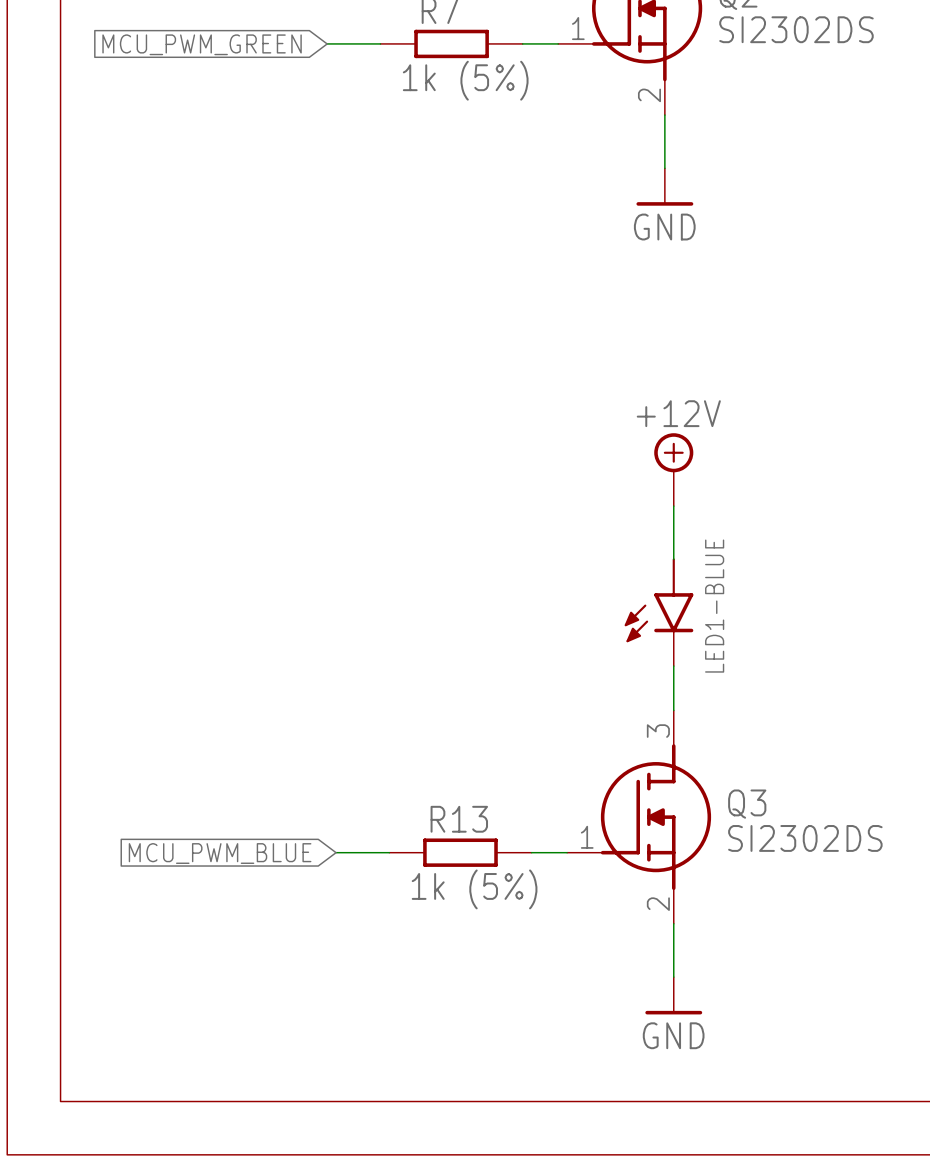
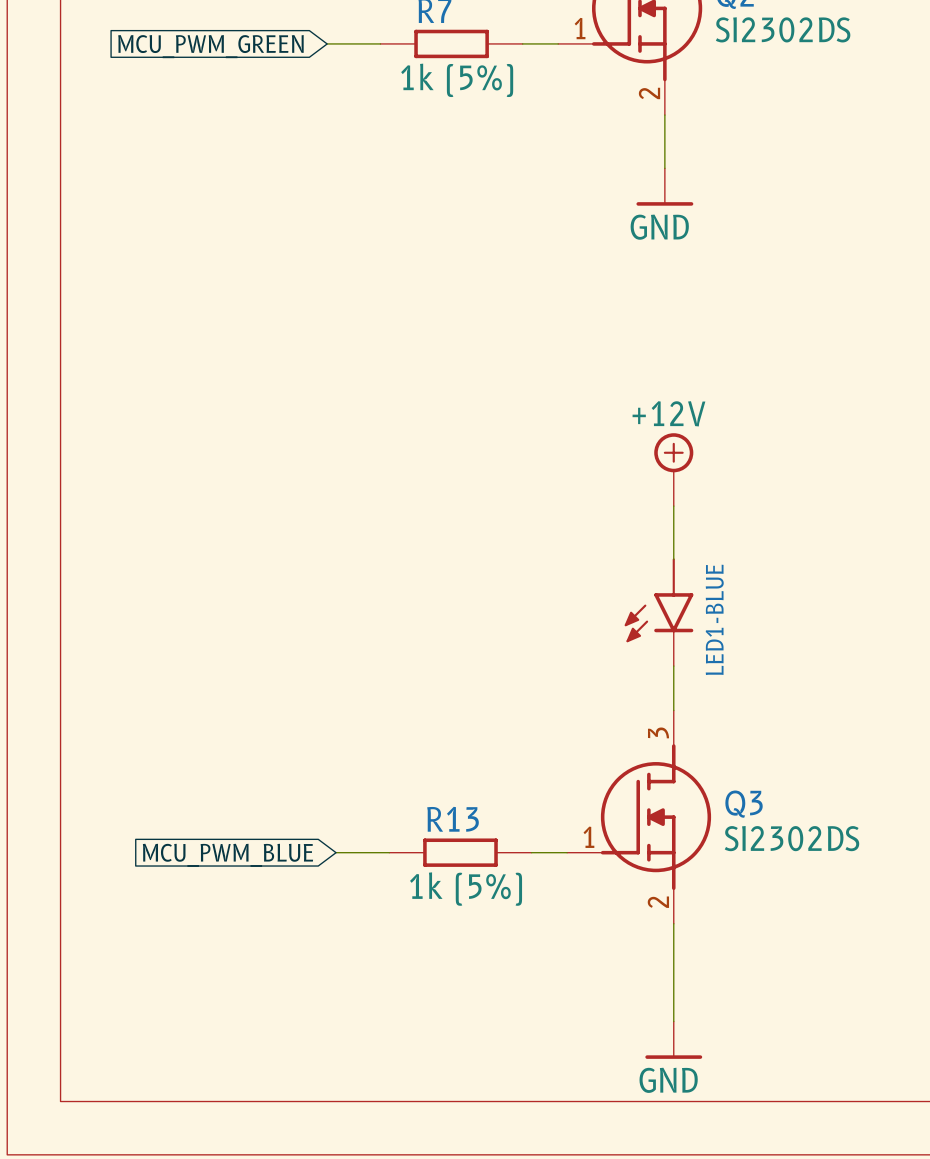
power symbol position: GND (673, 995) -> GND (673, 1040)

